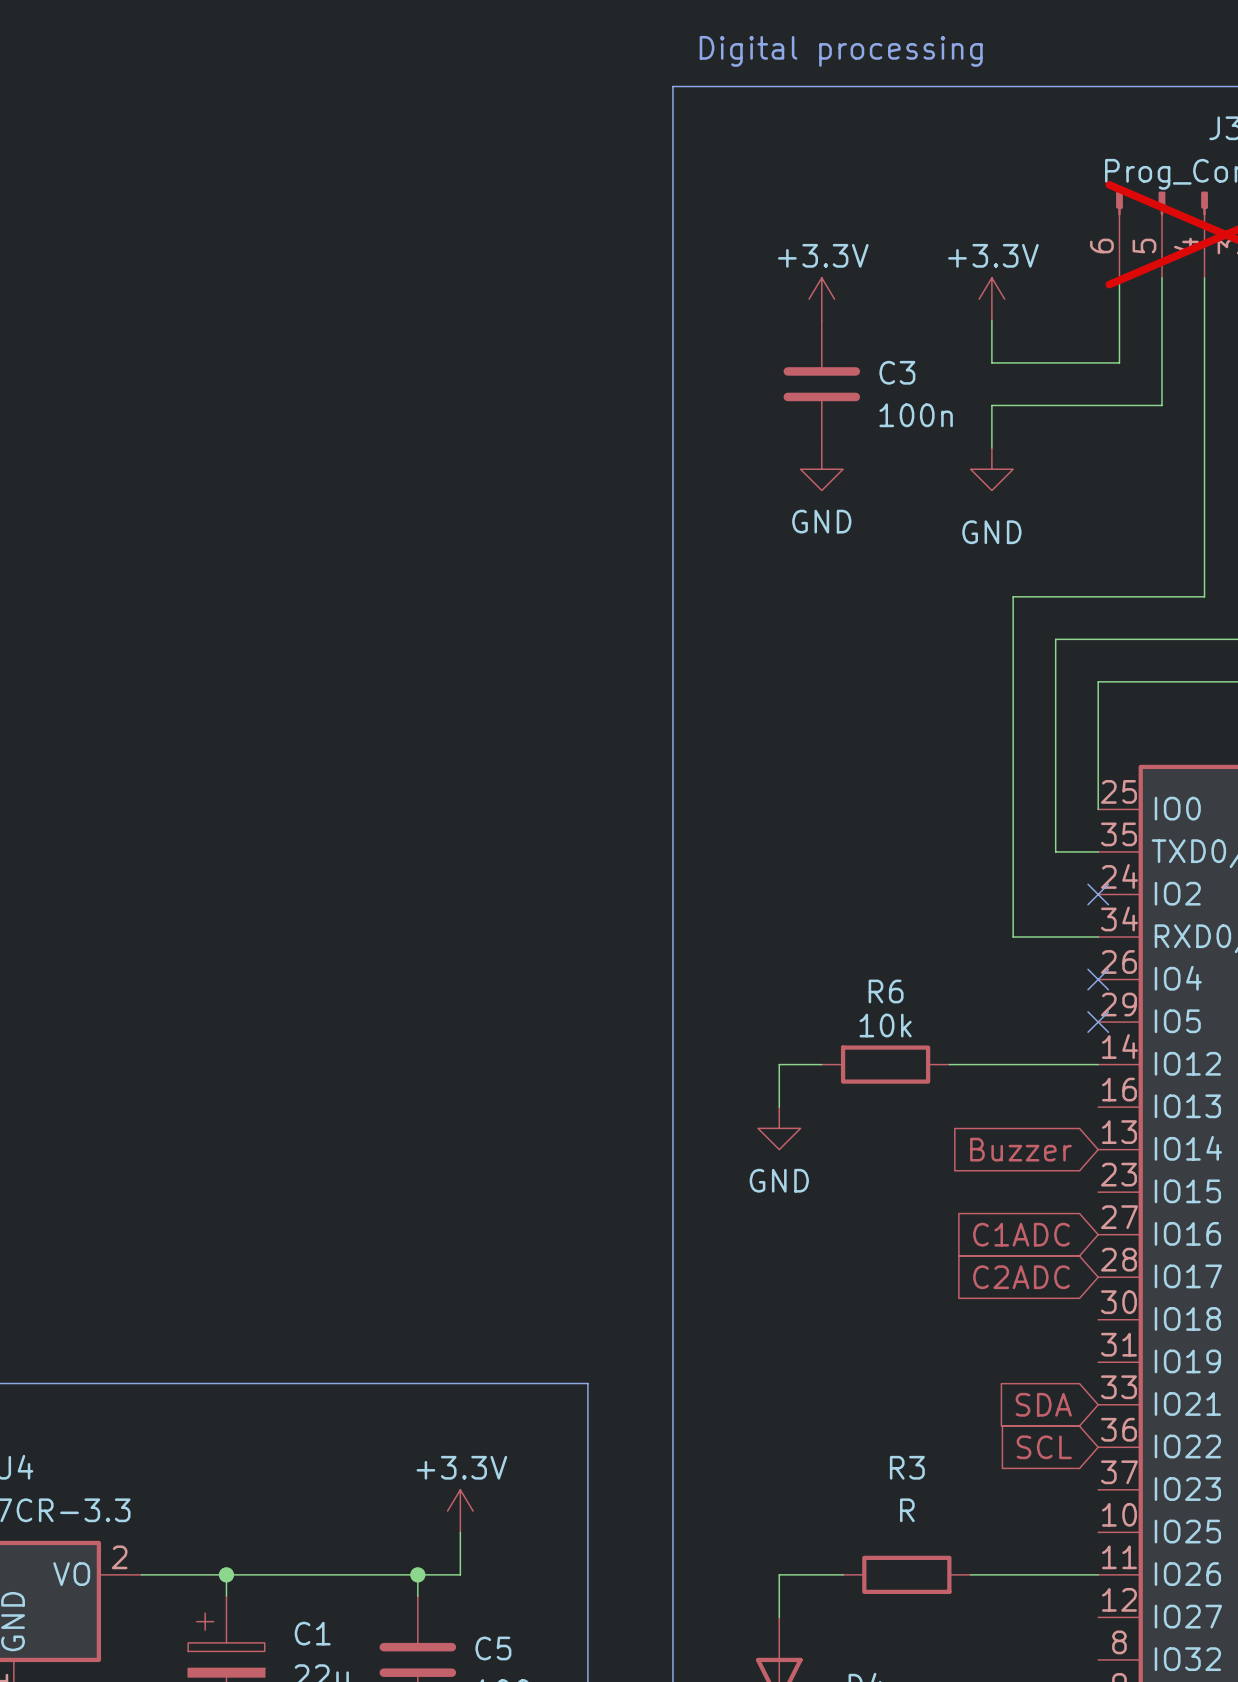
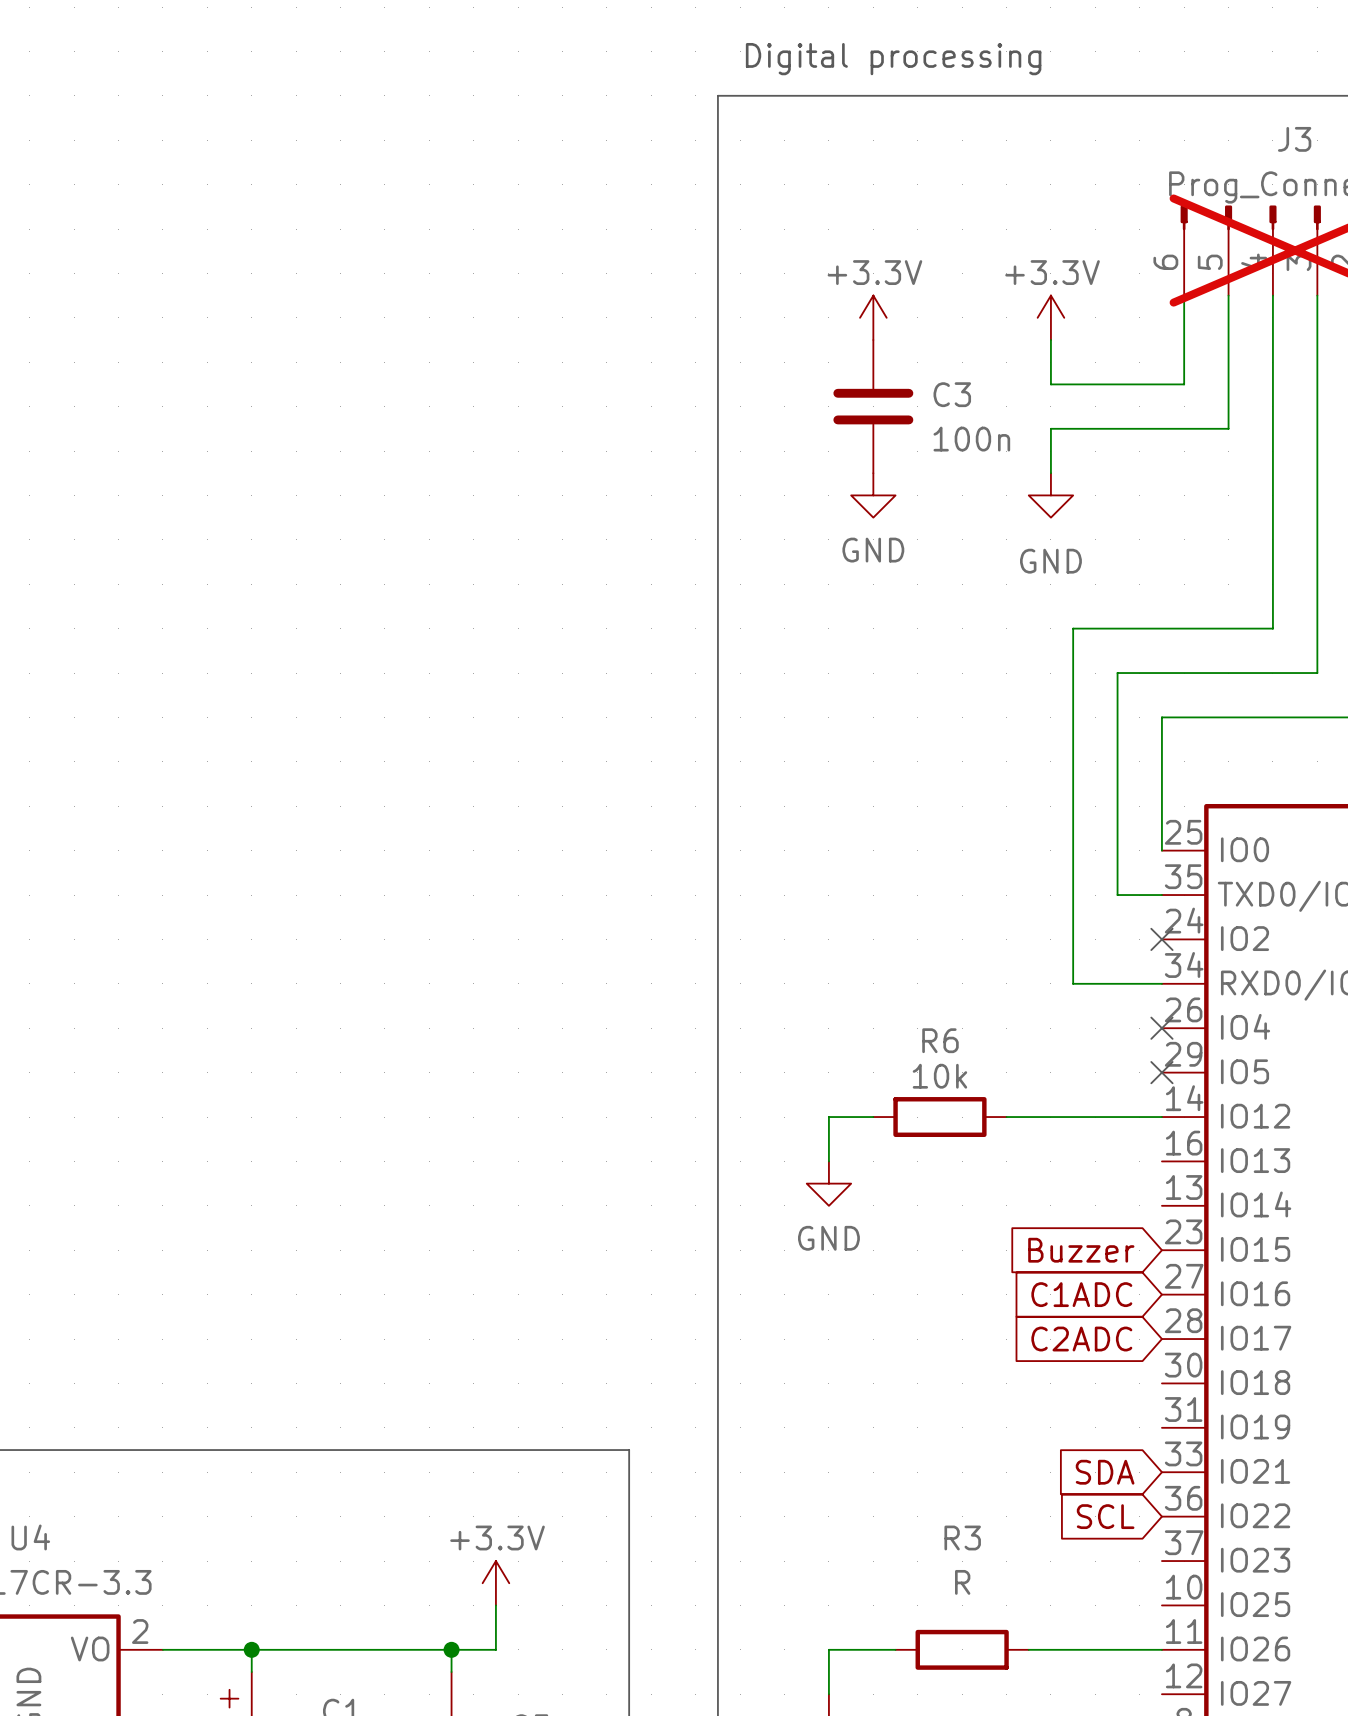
global label position: Buzzer (1020, 1149) -> Buzzer (1081, 1250)

